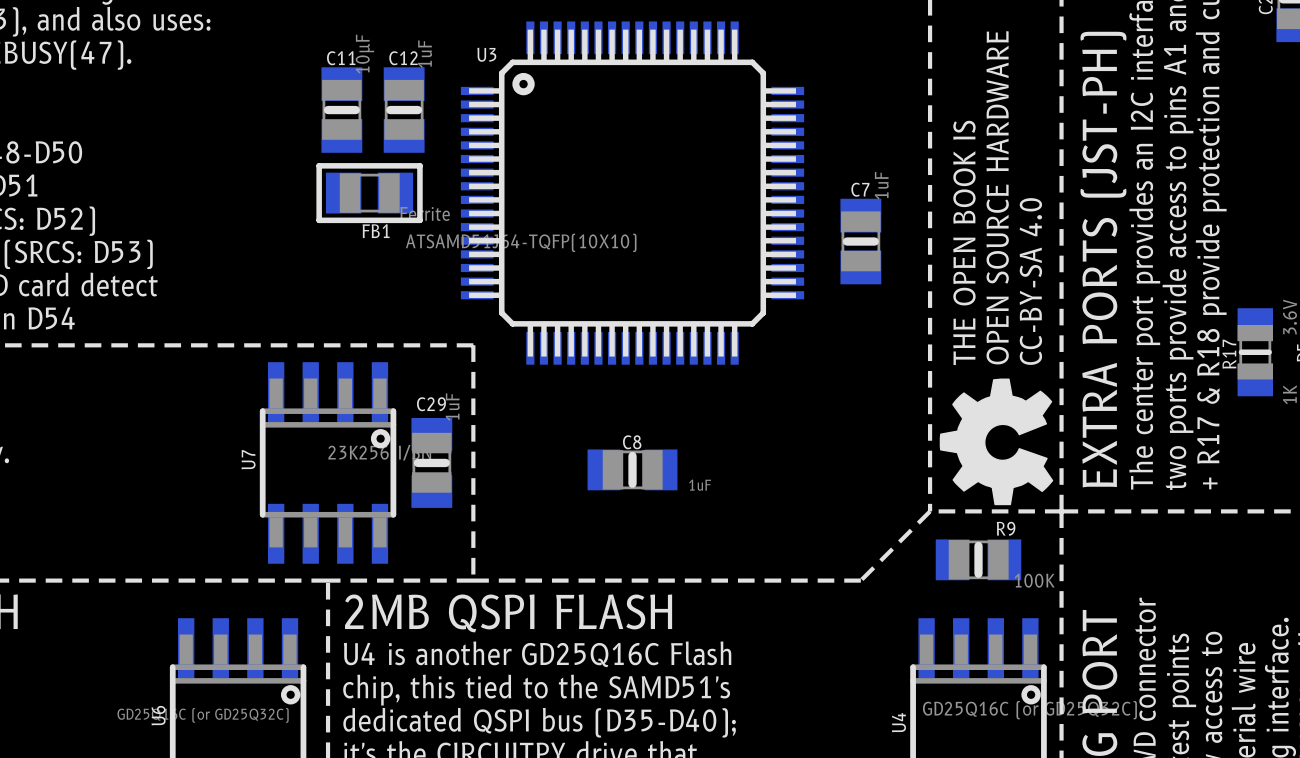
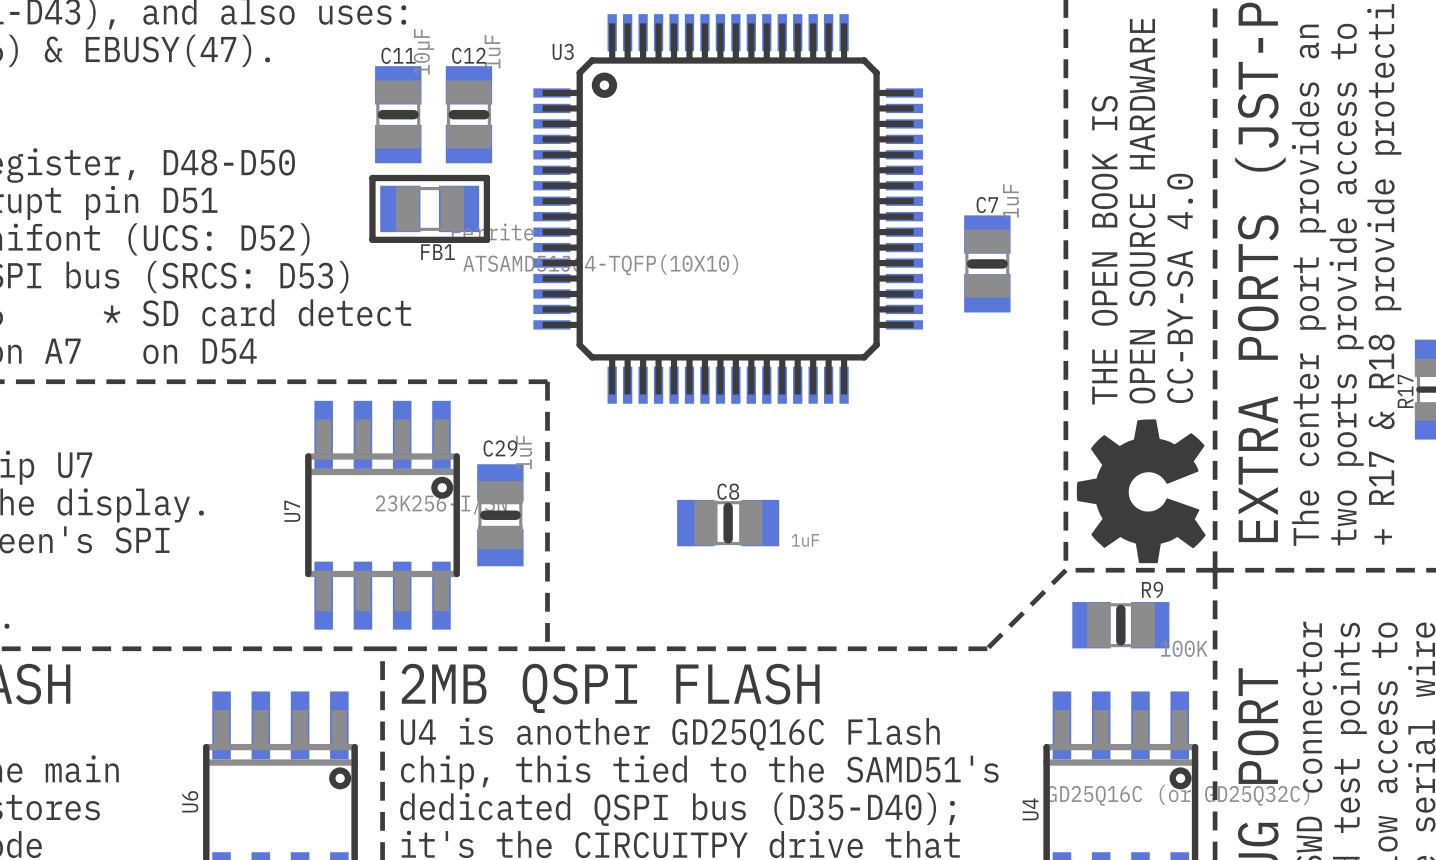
U6 value: GD25Q16C (or GD25Q32C) (203, 715) -> none

